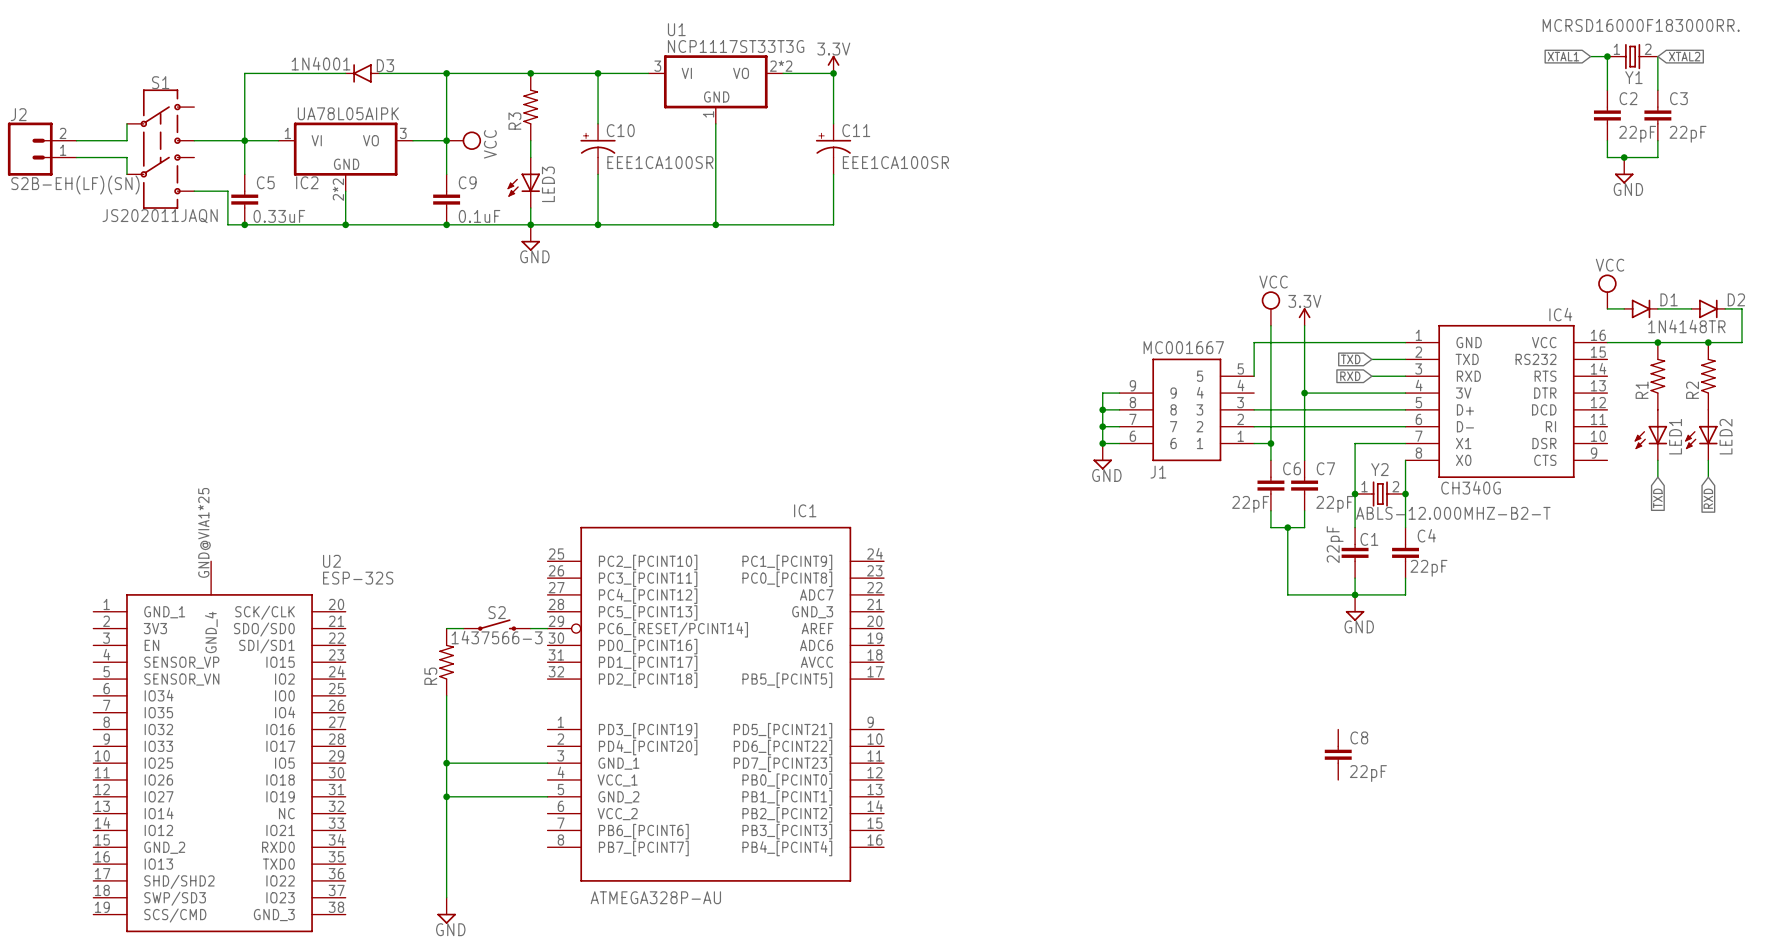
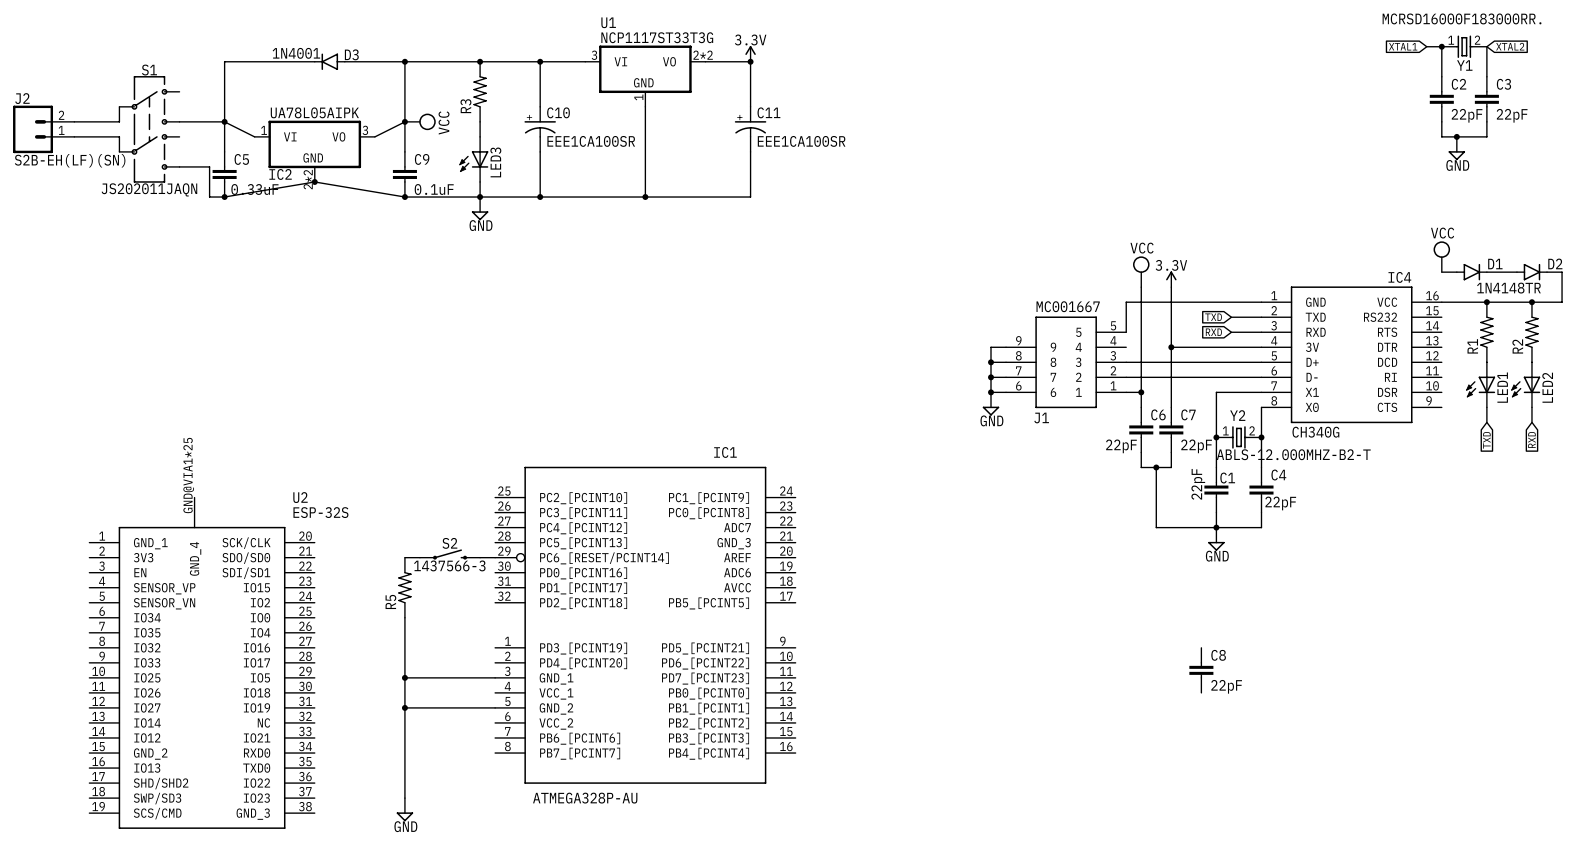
wire: (244, 140) (278, 140) -> (224, 121) (254, 136)
wire: (412, 140) (446, 140) -> (374, 136) (404, 121)
IC2 position: (345, 156) -> (314, 151)
wire: (244, 224) (446, 224) -> (224, 197) (314, 181) (404, 197)
junction position: (345, 224) -> (314, 181)

